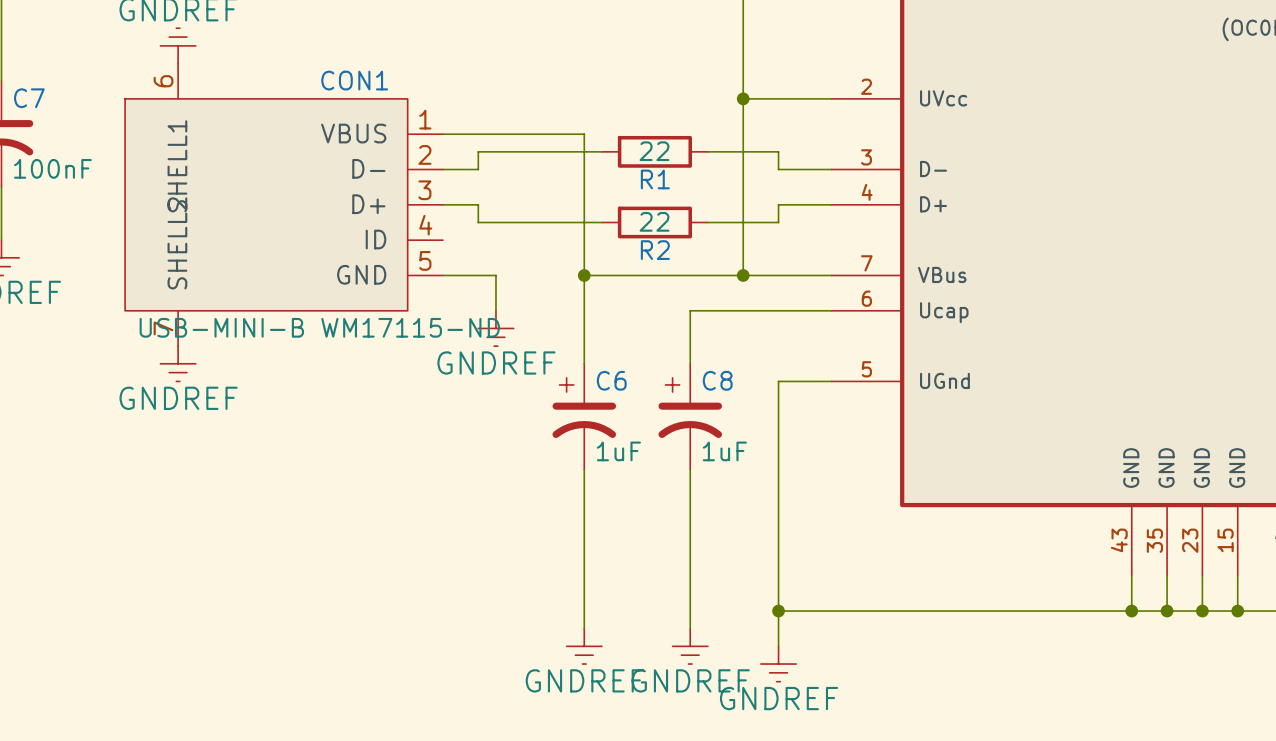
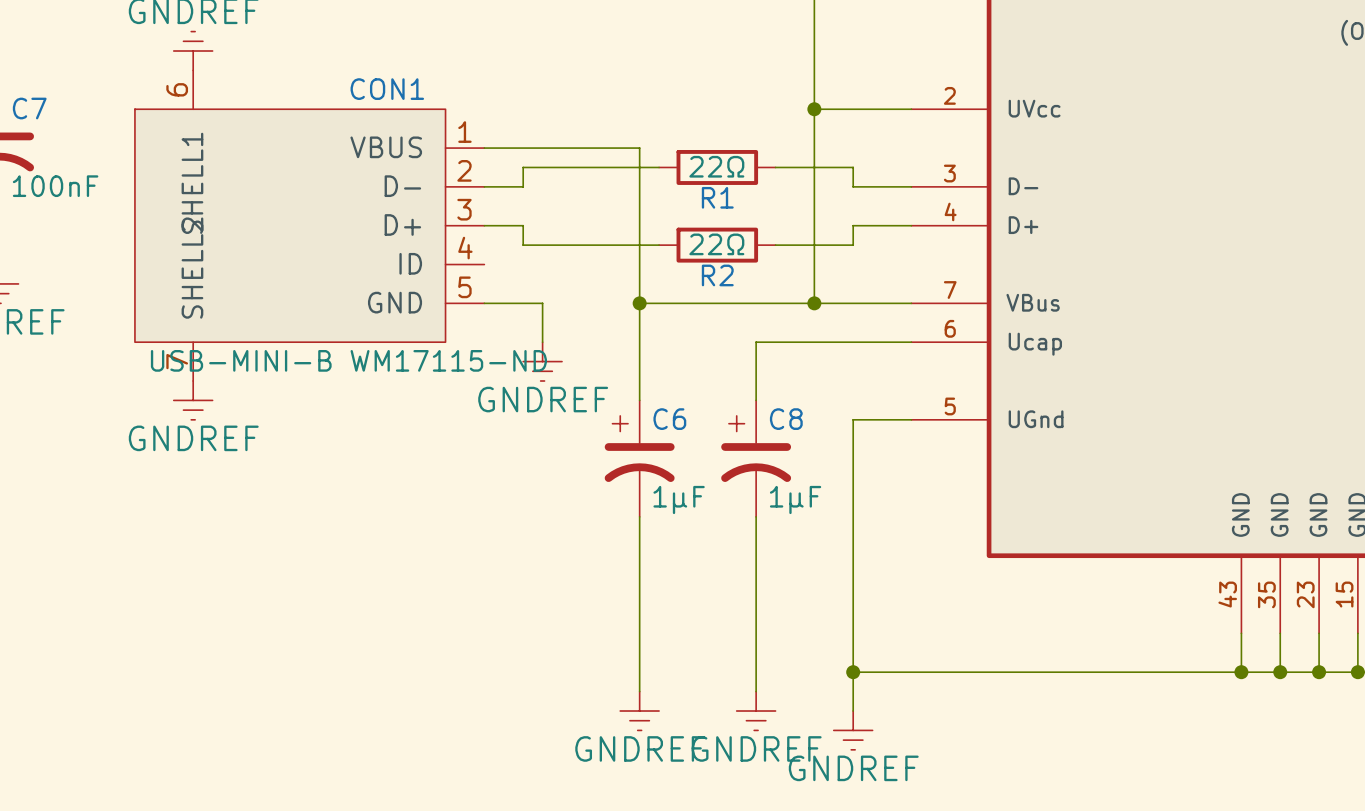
R1 value: 22 (654, 151) -> 22Ω (716, 166)
R2 value: 22 (654, 221) -> 22Ω (716, 244)
C6 value: 1uF (618, 451) -> 1µF (679, 499)
C8 value: 1uF (724, 451) -> 1µF (795, 499)

